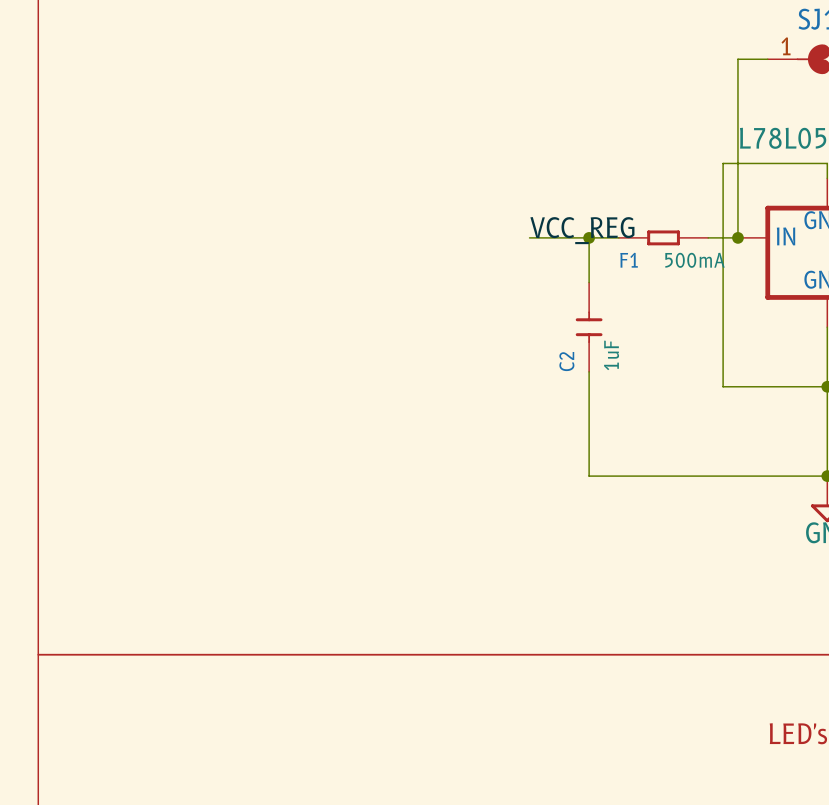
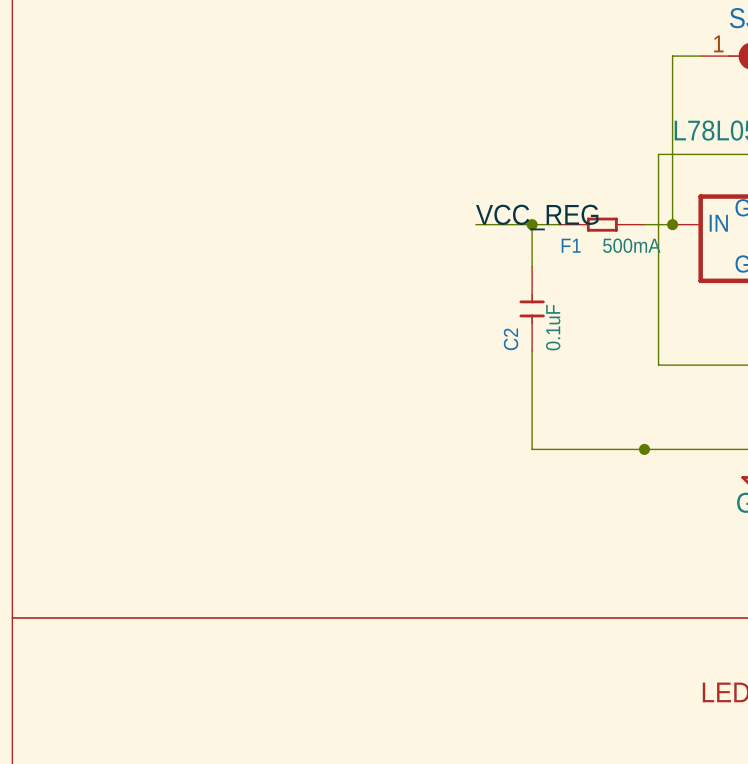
C2 value: 1uF (611, 355) -> 0.1uF (553, 327)
junction: none -> (644, 449)

